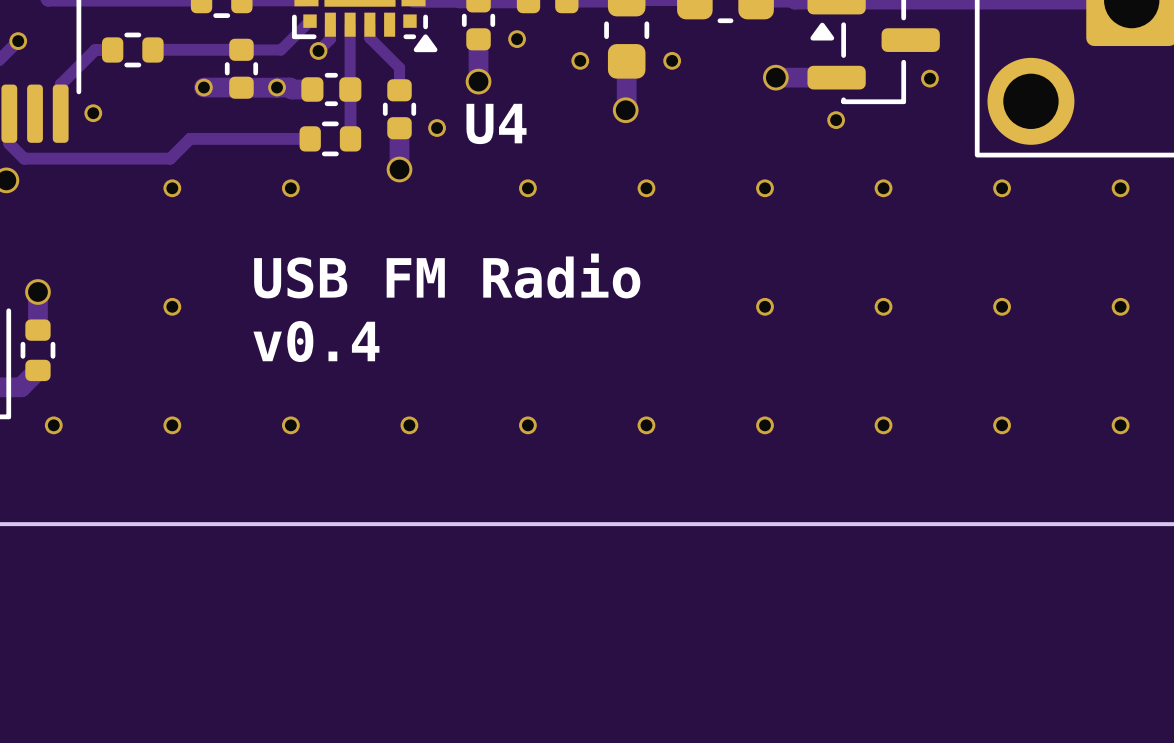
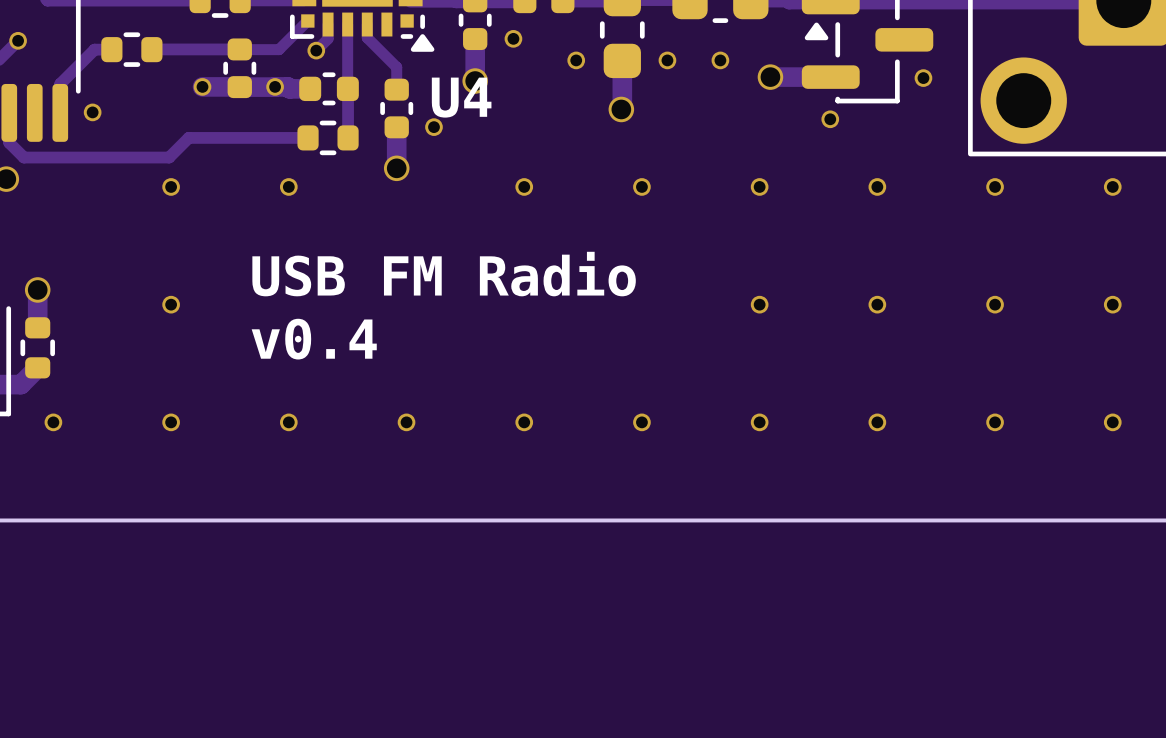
via: none -> (720, 60)
U4 name position: U4 (496, 123) -> U4 (461, 97)

